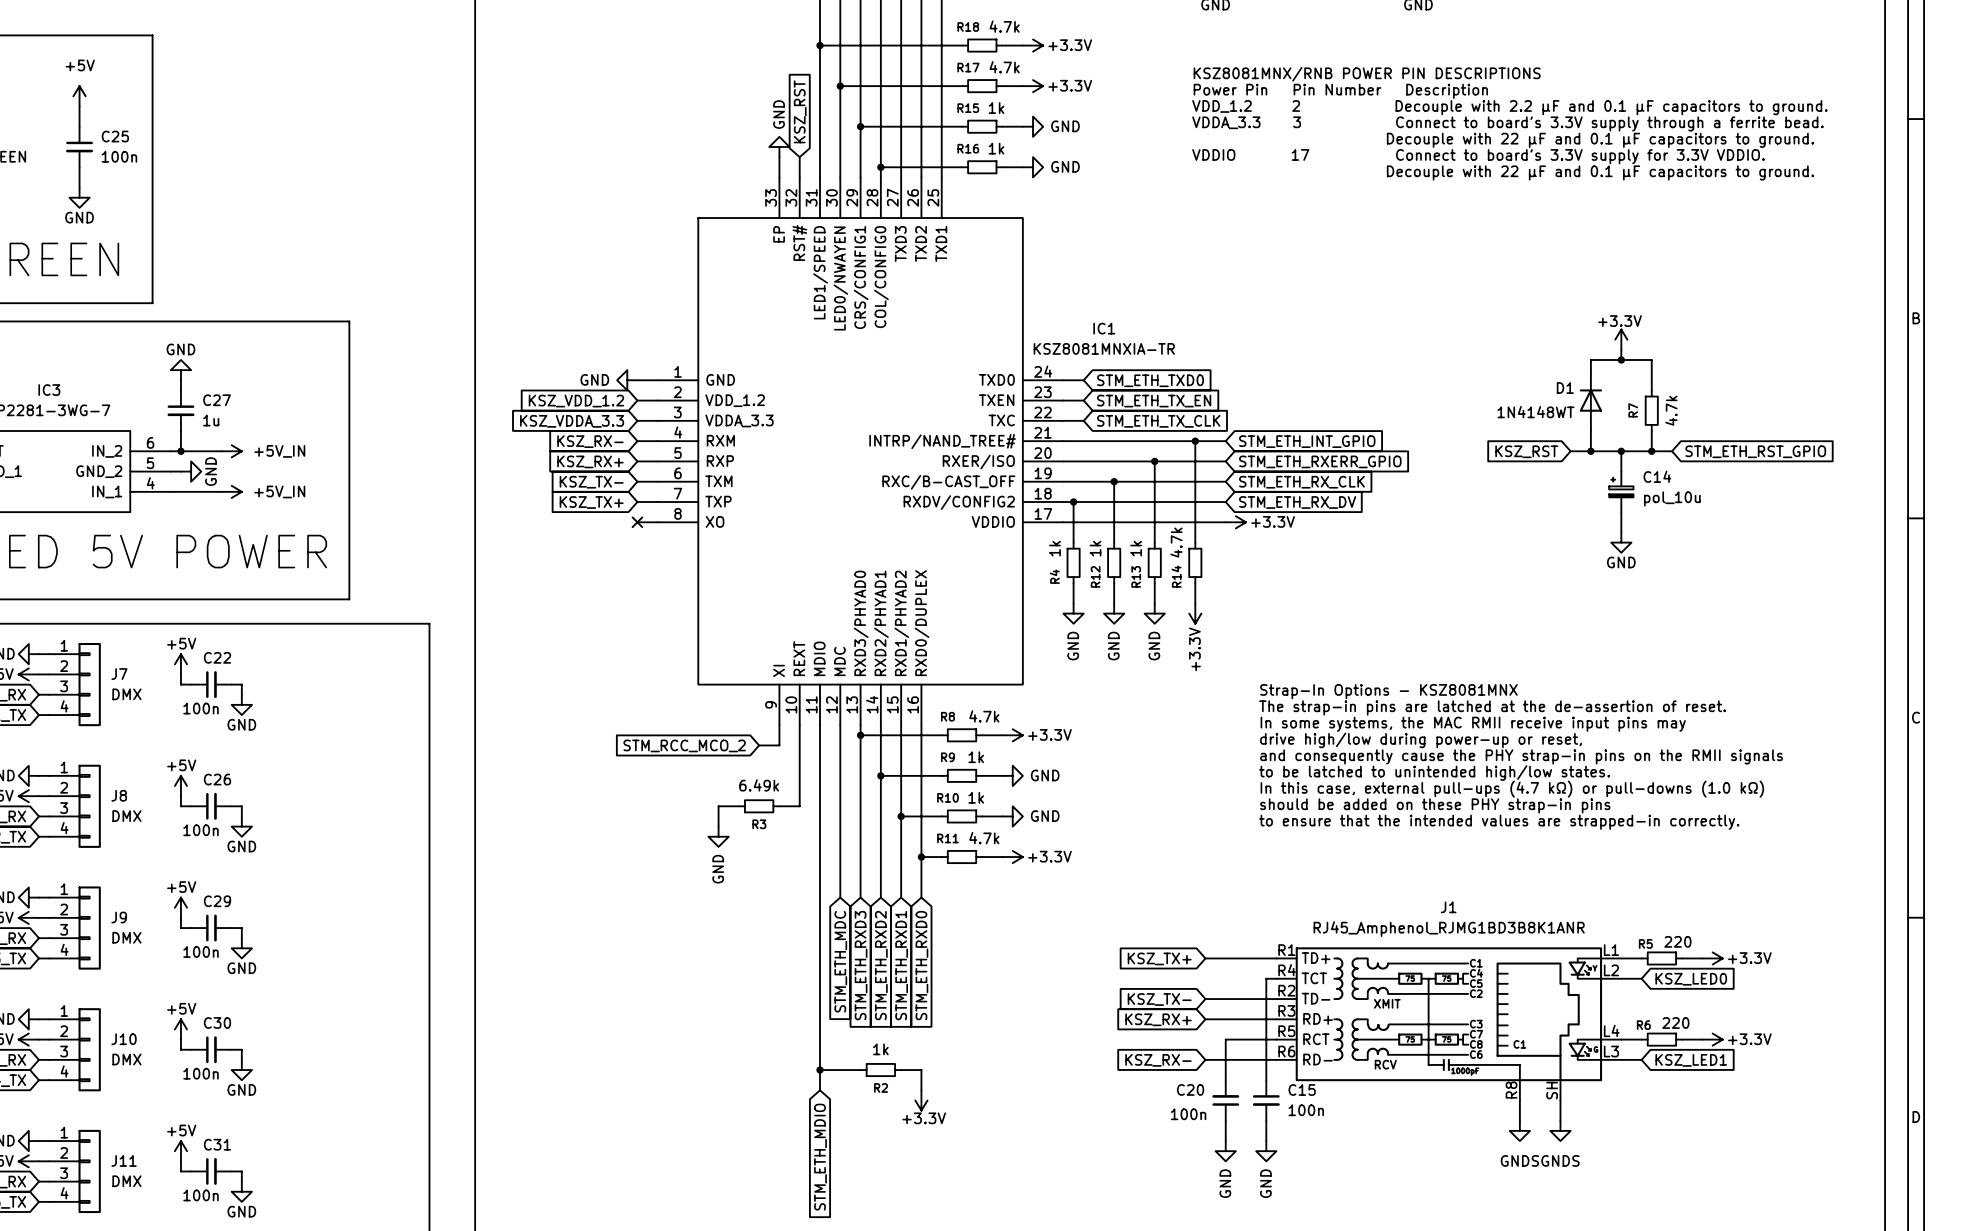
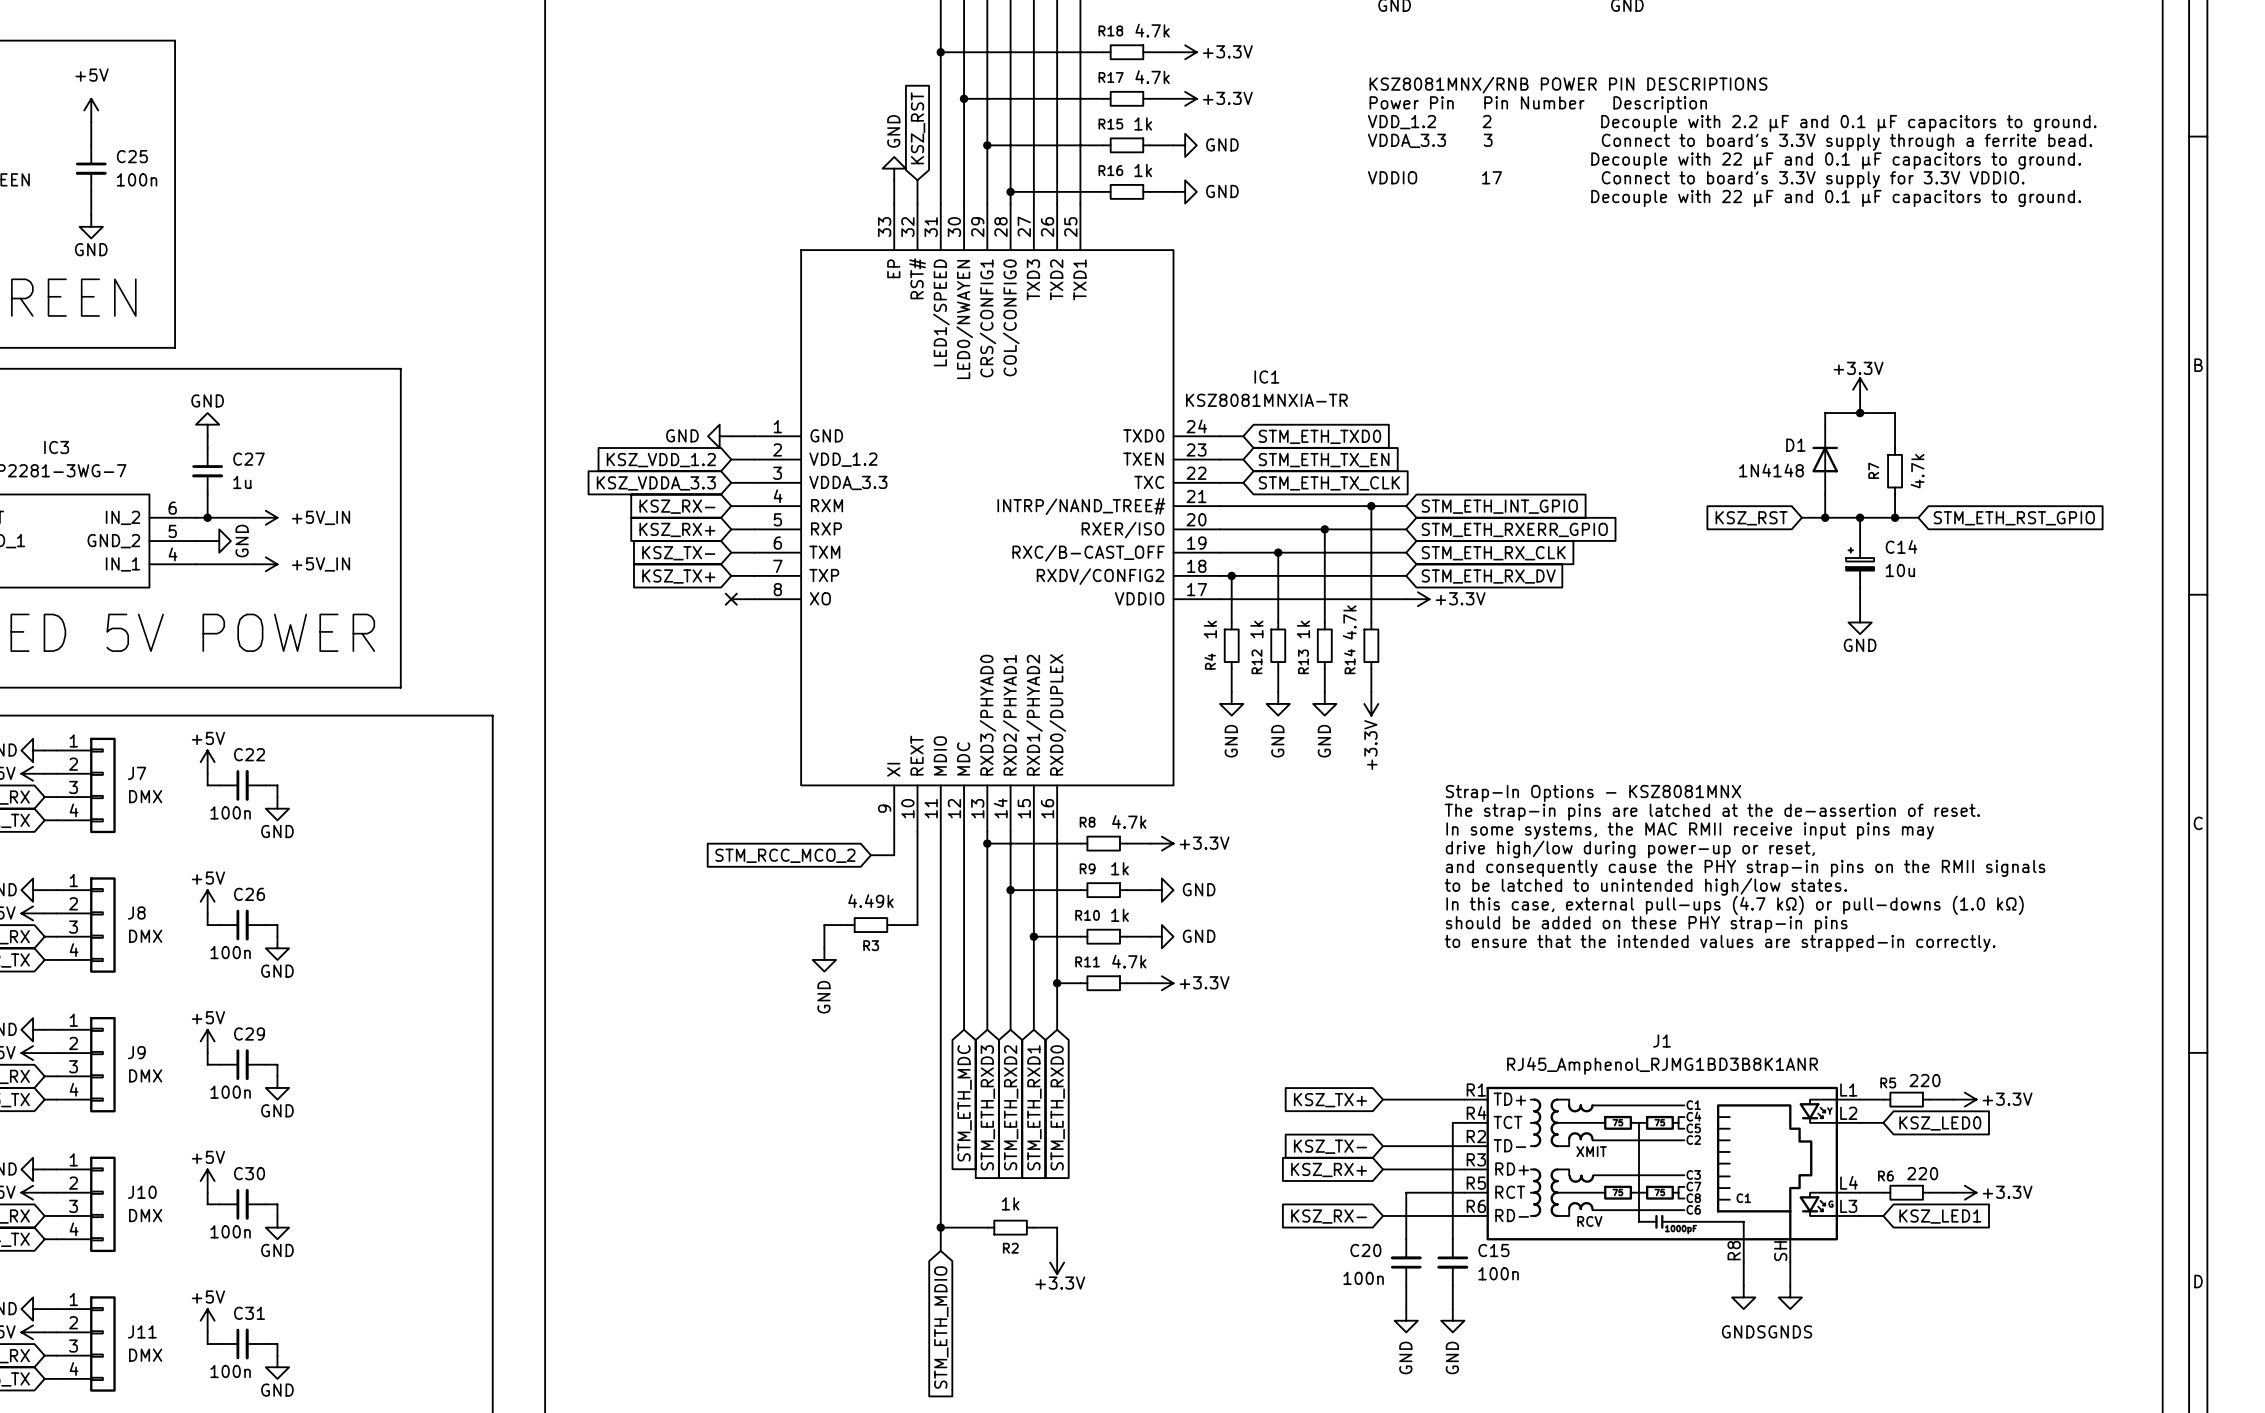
D1 value: 1N4148WT (1535, 412) -> 1N4148 (1771, 470)
C14 value: pol_10u (1672, 498) -> 10u (1900, 570)
R3 value: 6.49k (759, 785) -> 4.49k (870, 901)

